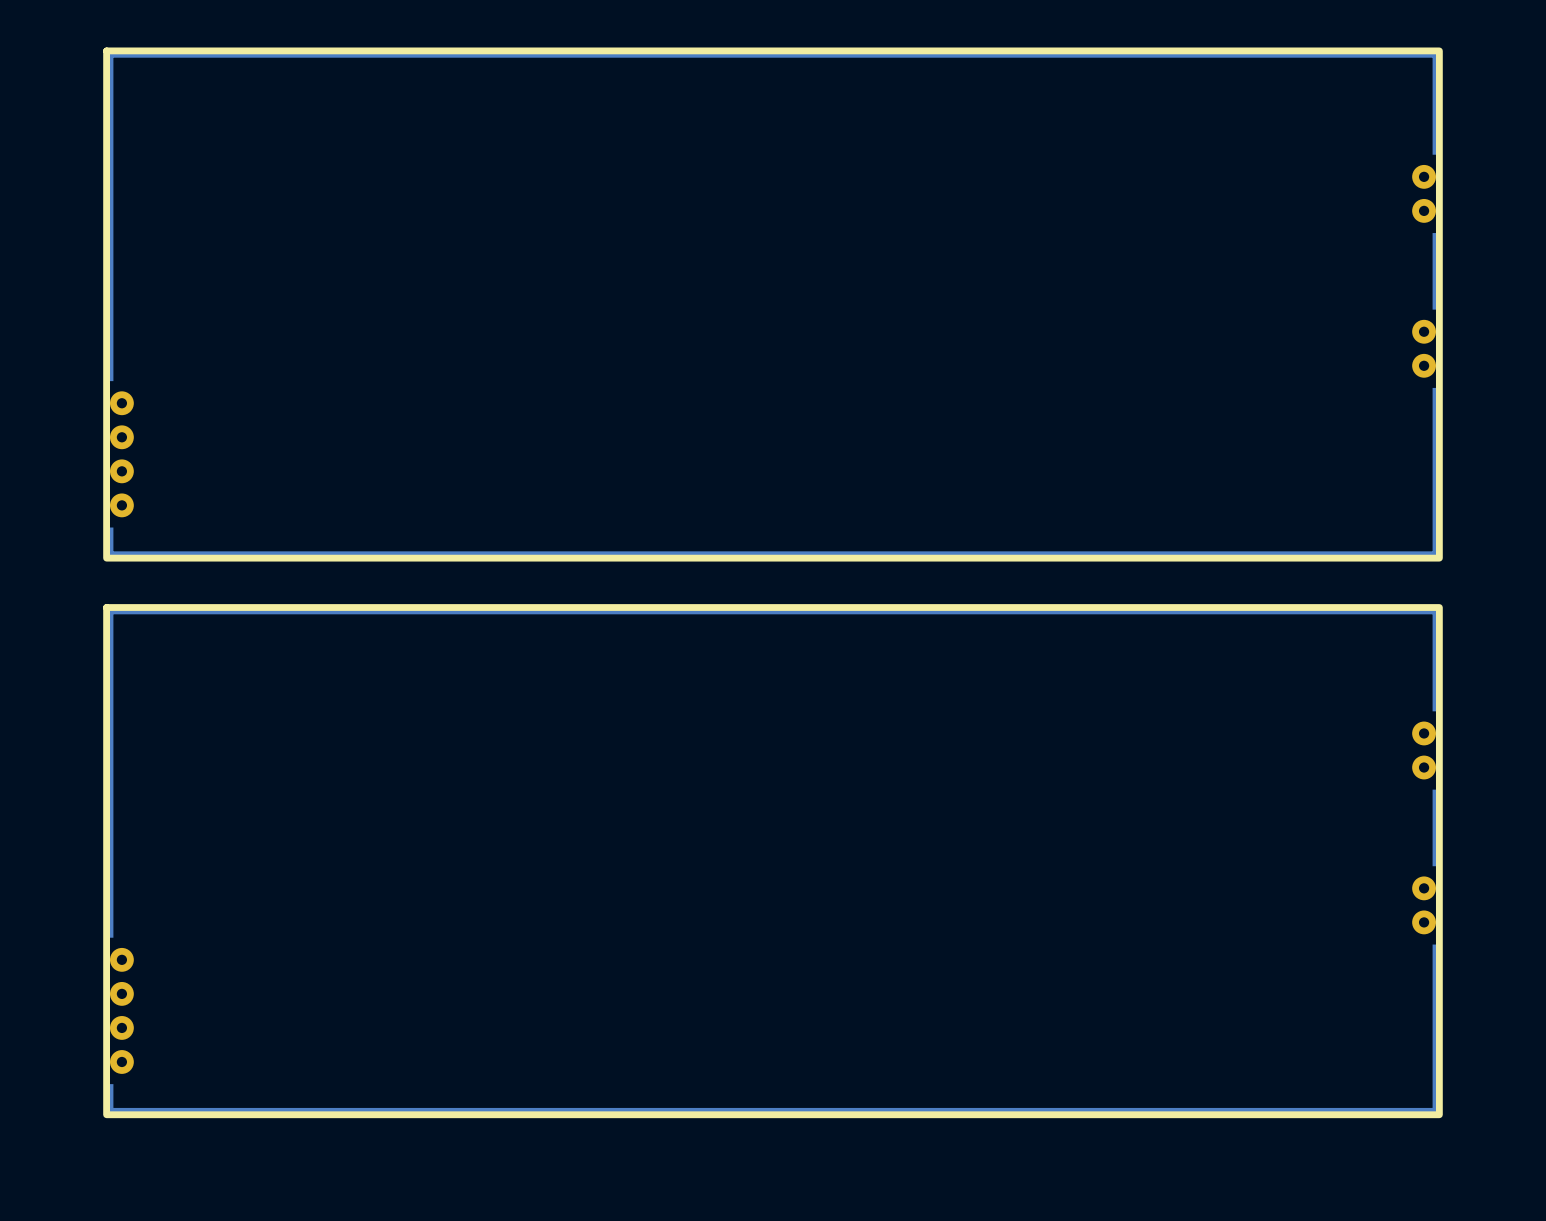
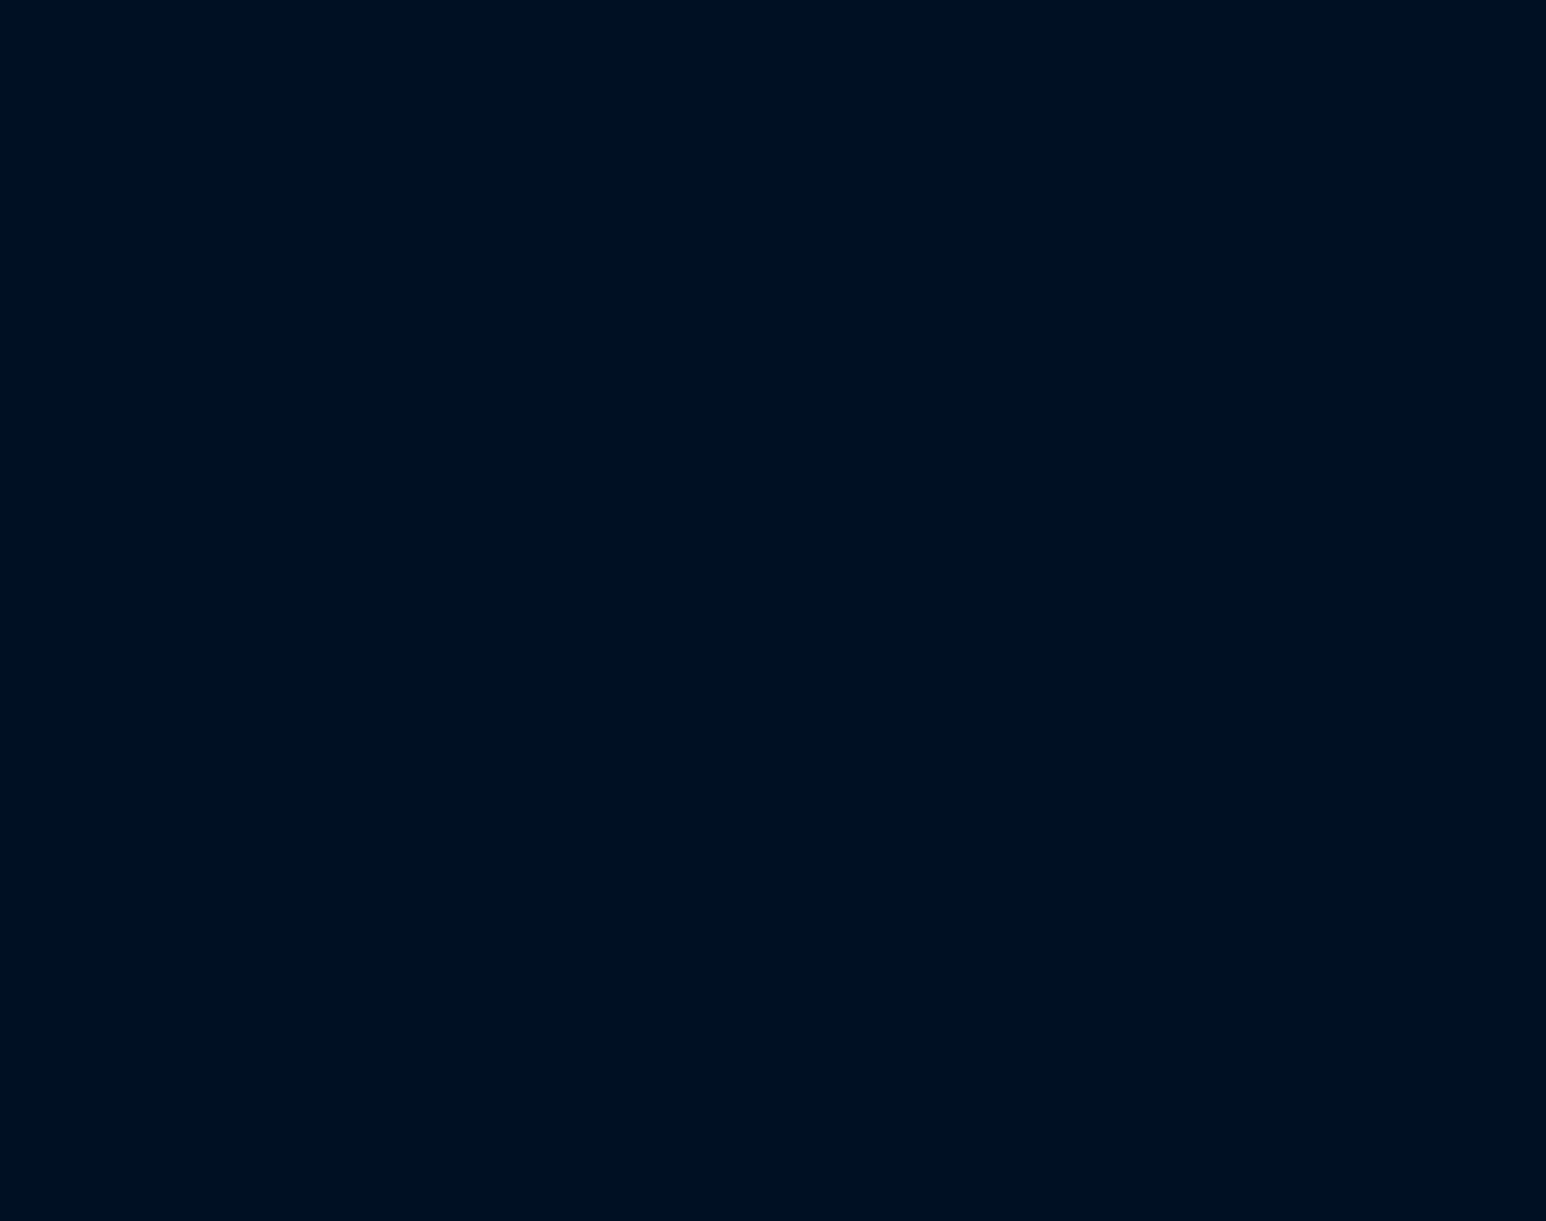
part: (772, 304) -> none
part: (772, 861) -> none

